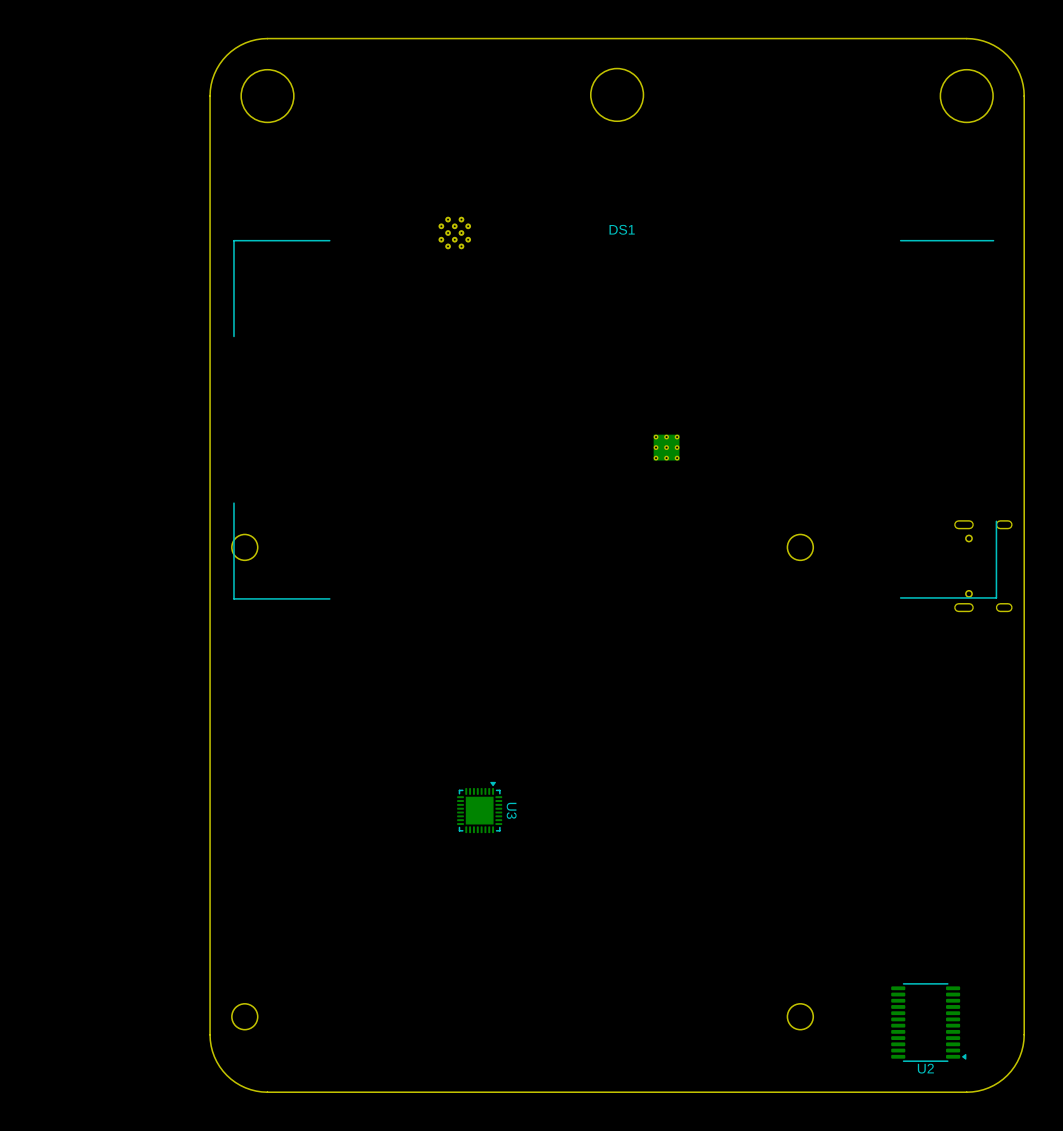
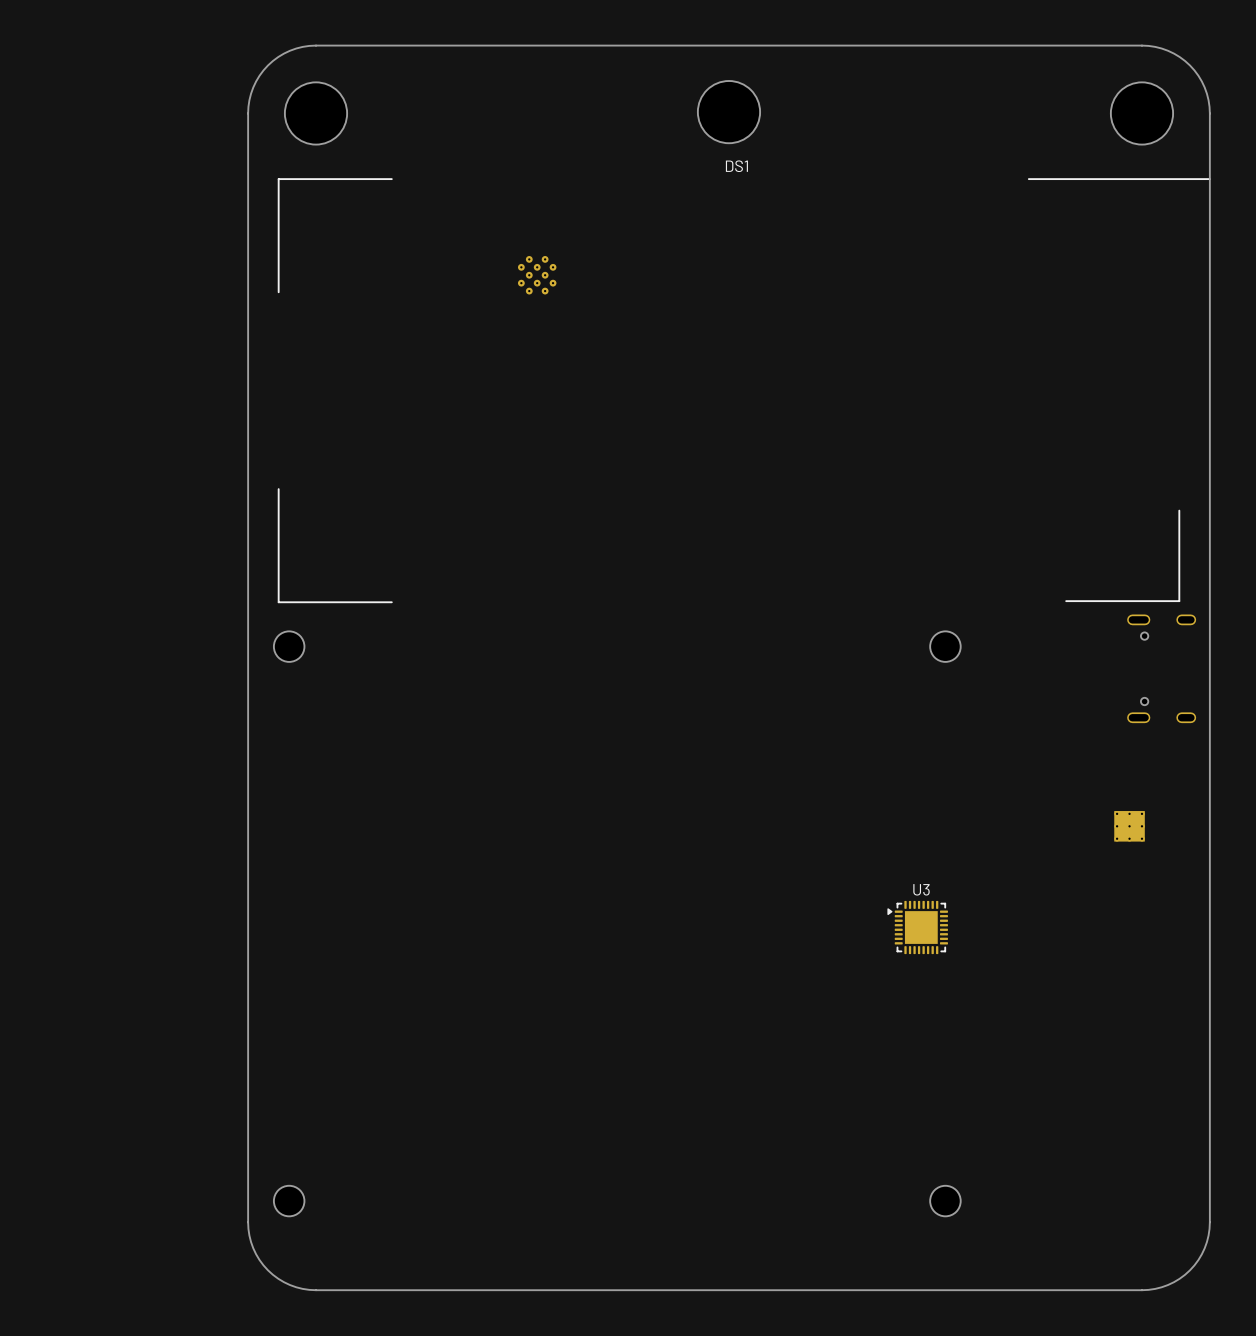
DS1 footprint: [233, 240, 998, 600] -> [277, 178, 1211, 603]
part: (666, 447) -> none
part: none -> (1129, 826)
U3 rotation: 0° (479, 807) -> 90° counterclockwise (917, 927)
U3 position: (479, 807) -> (917, 927)
U2: (928, 1022) -> none

